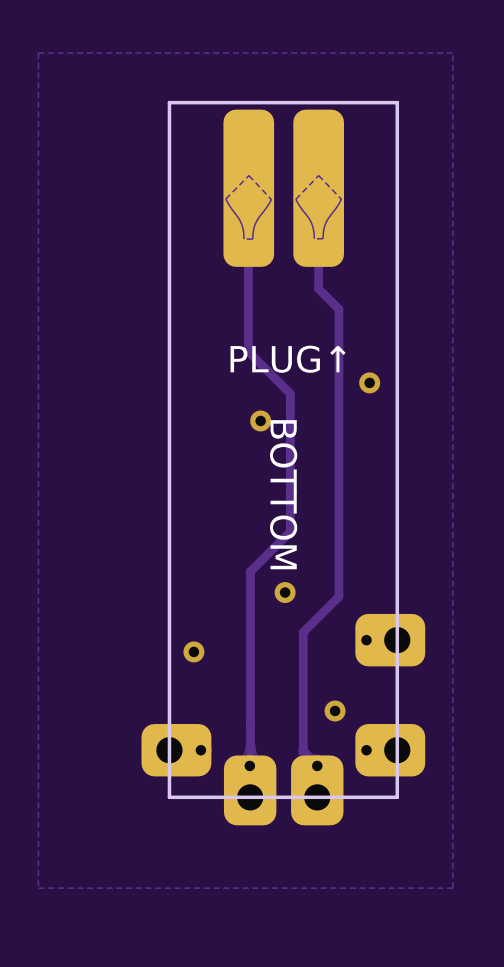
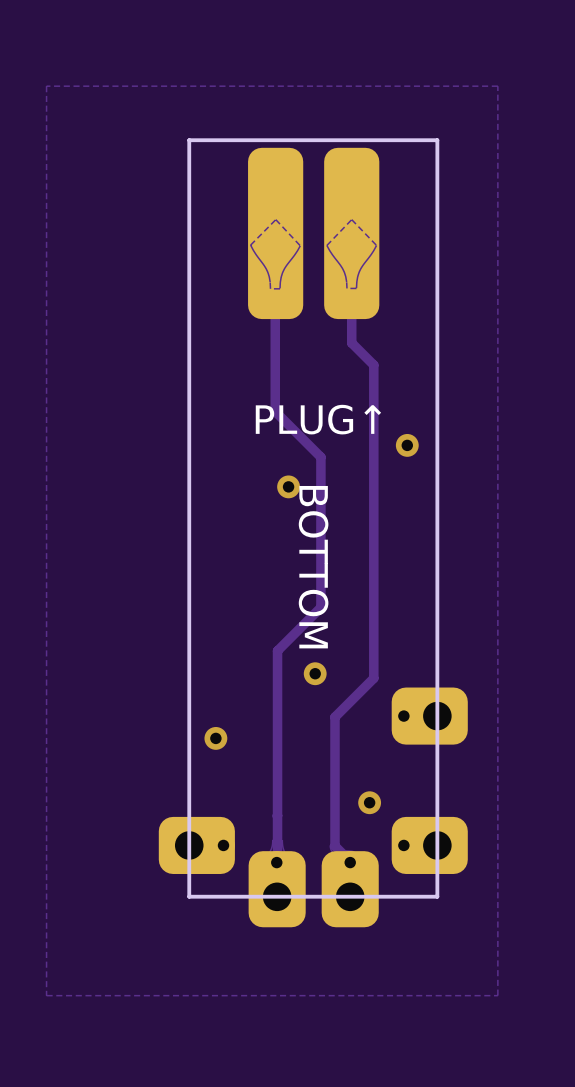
part footprint: [141, 613, 426, 826] -> [158, 687, 468, 928]

